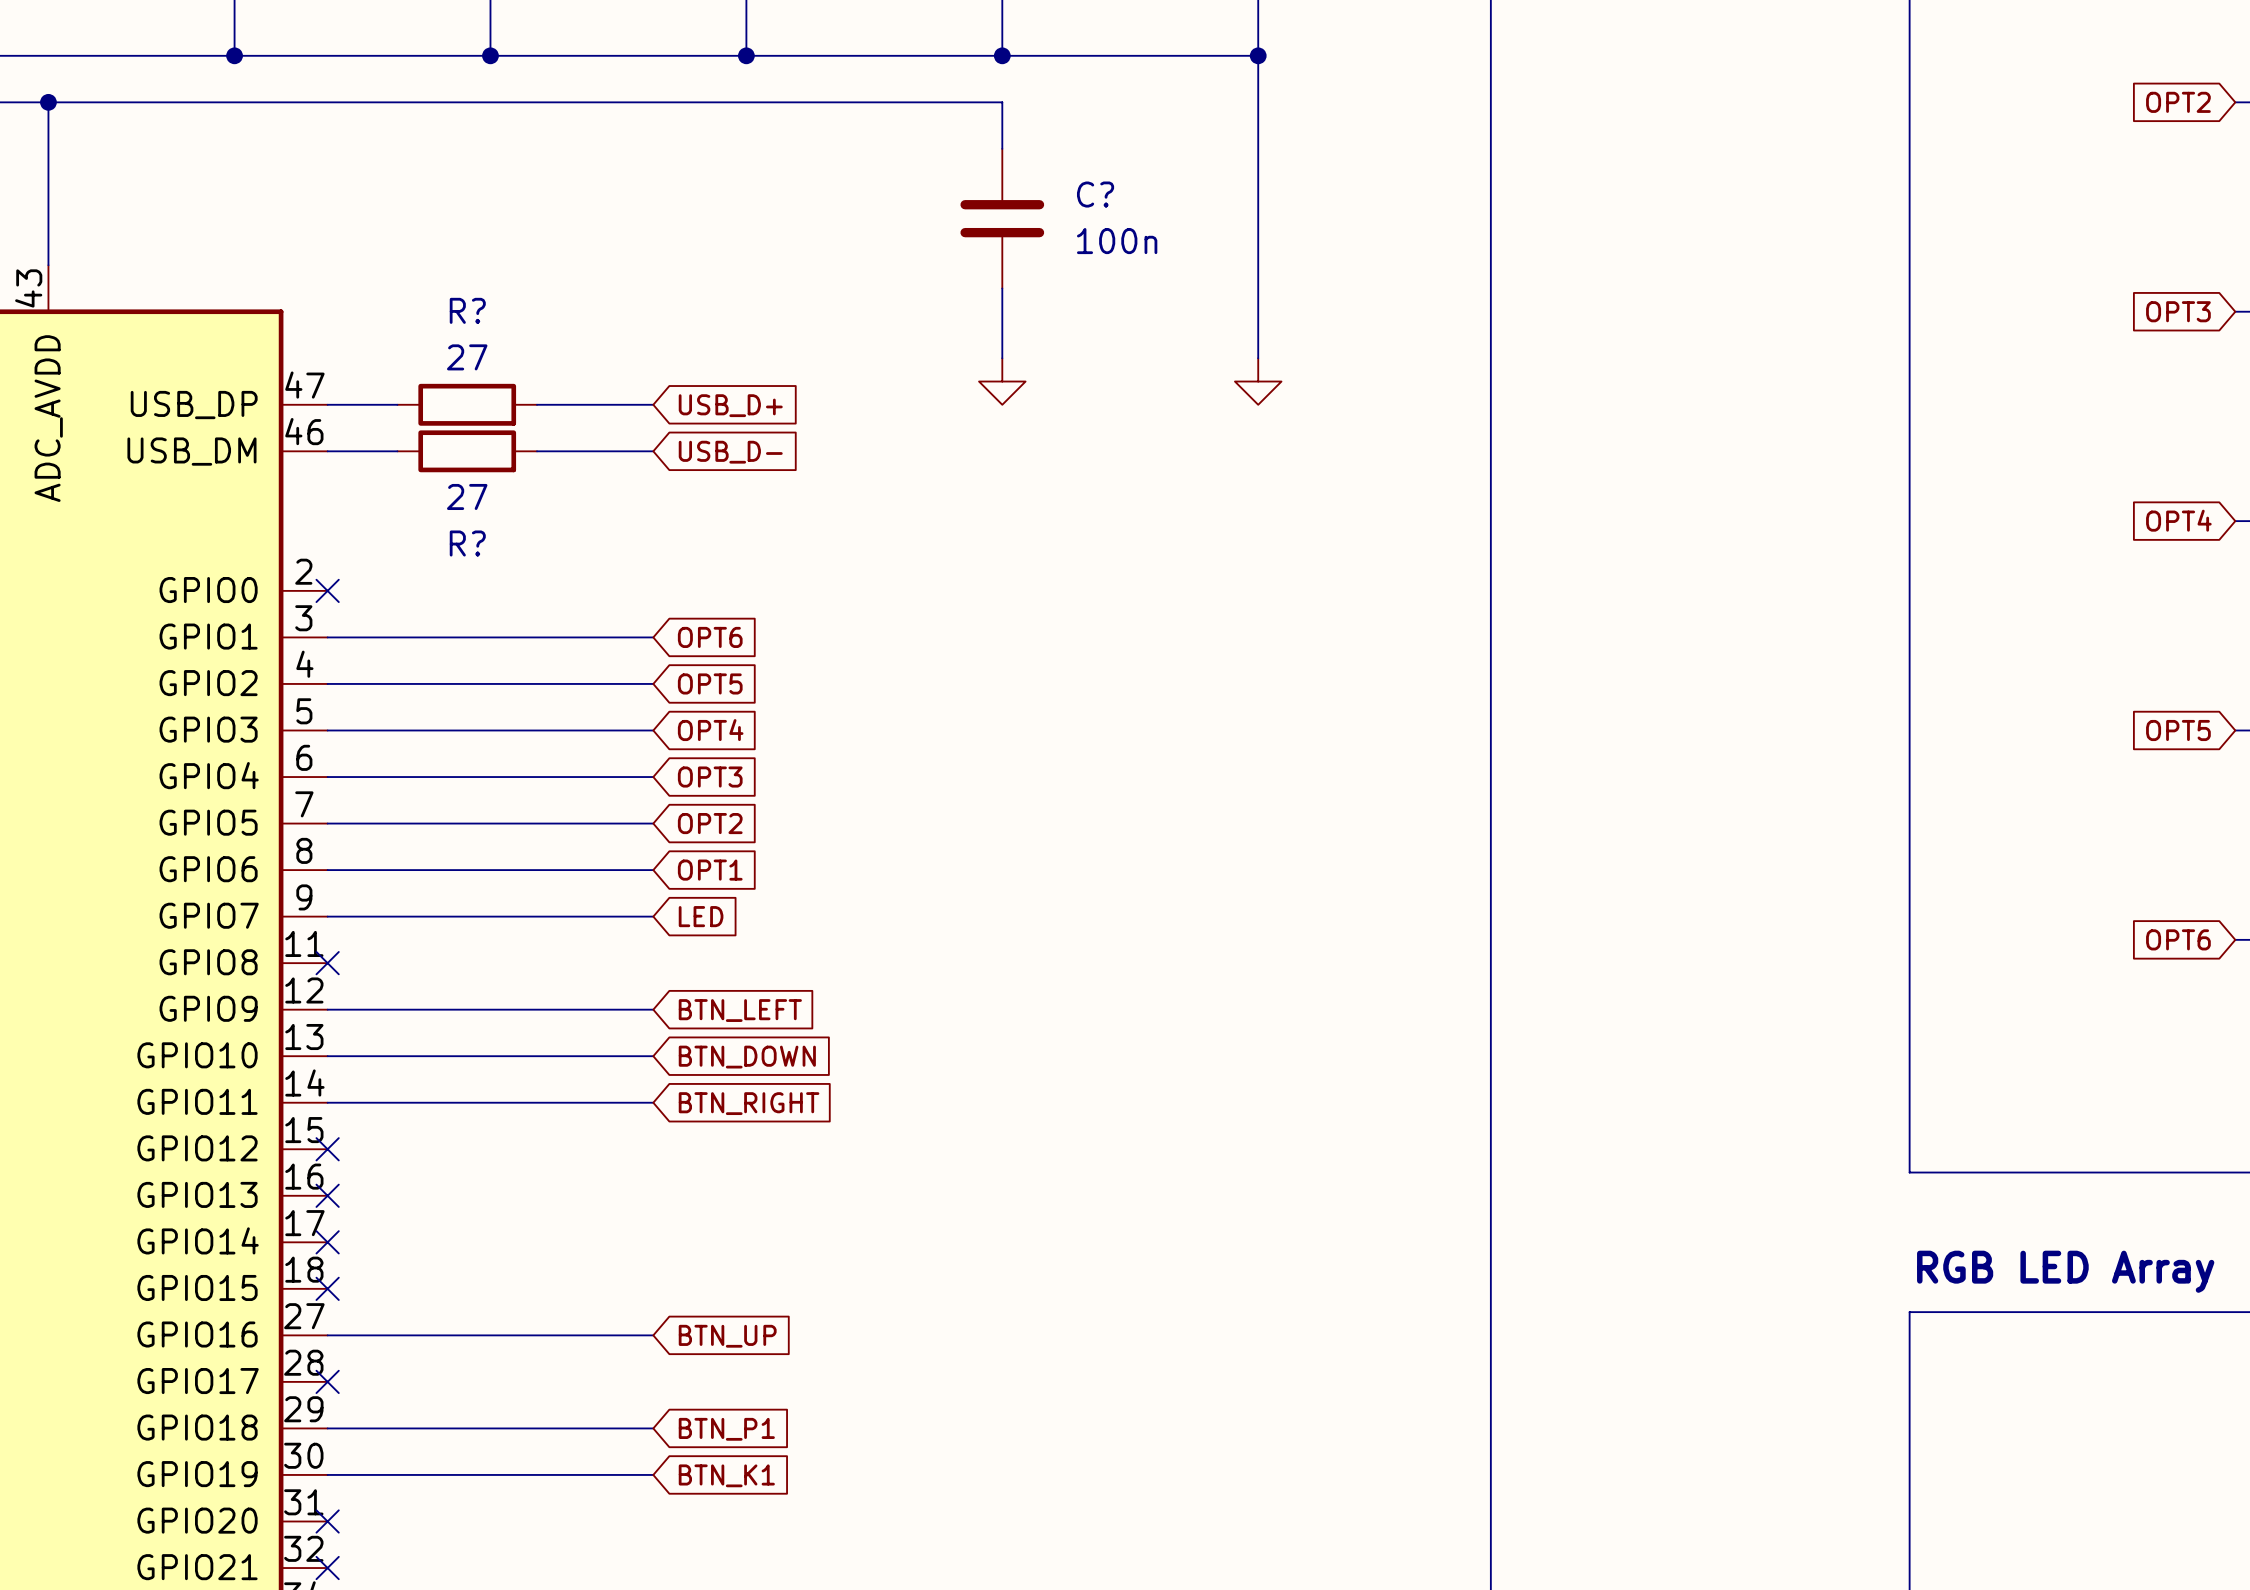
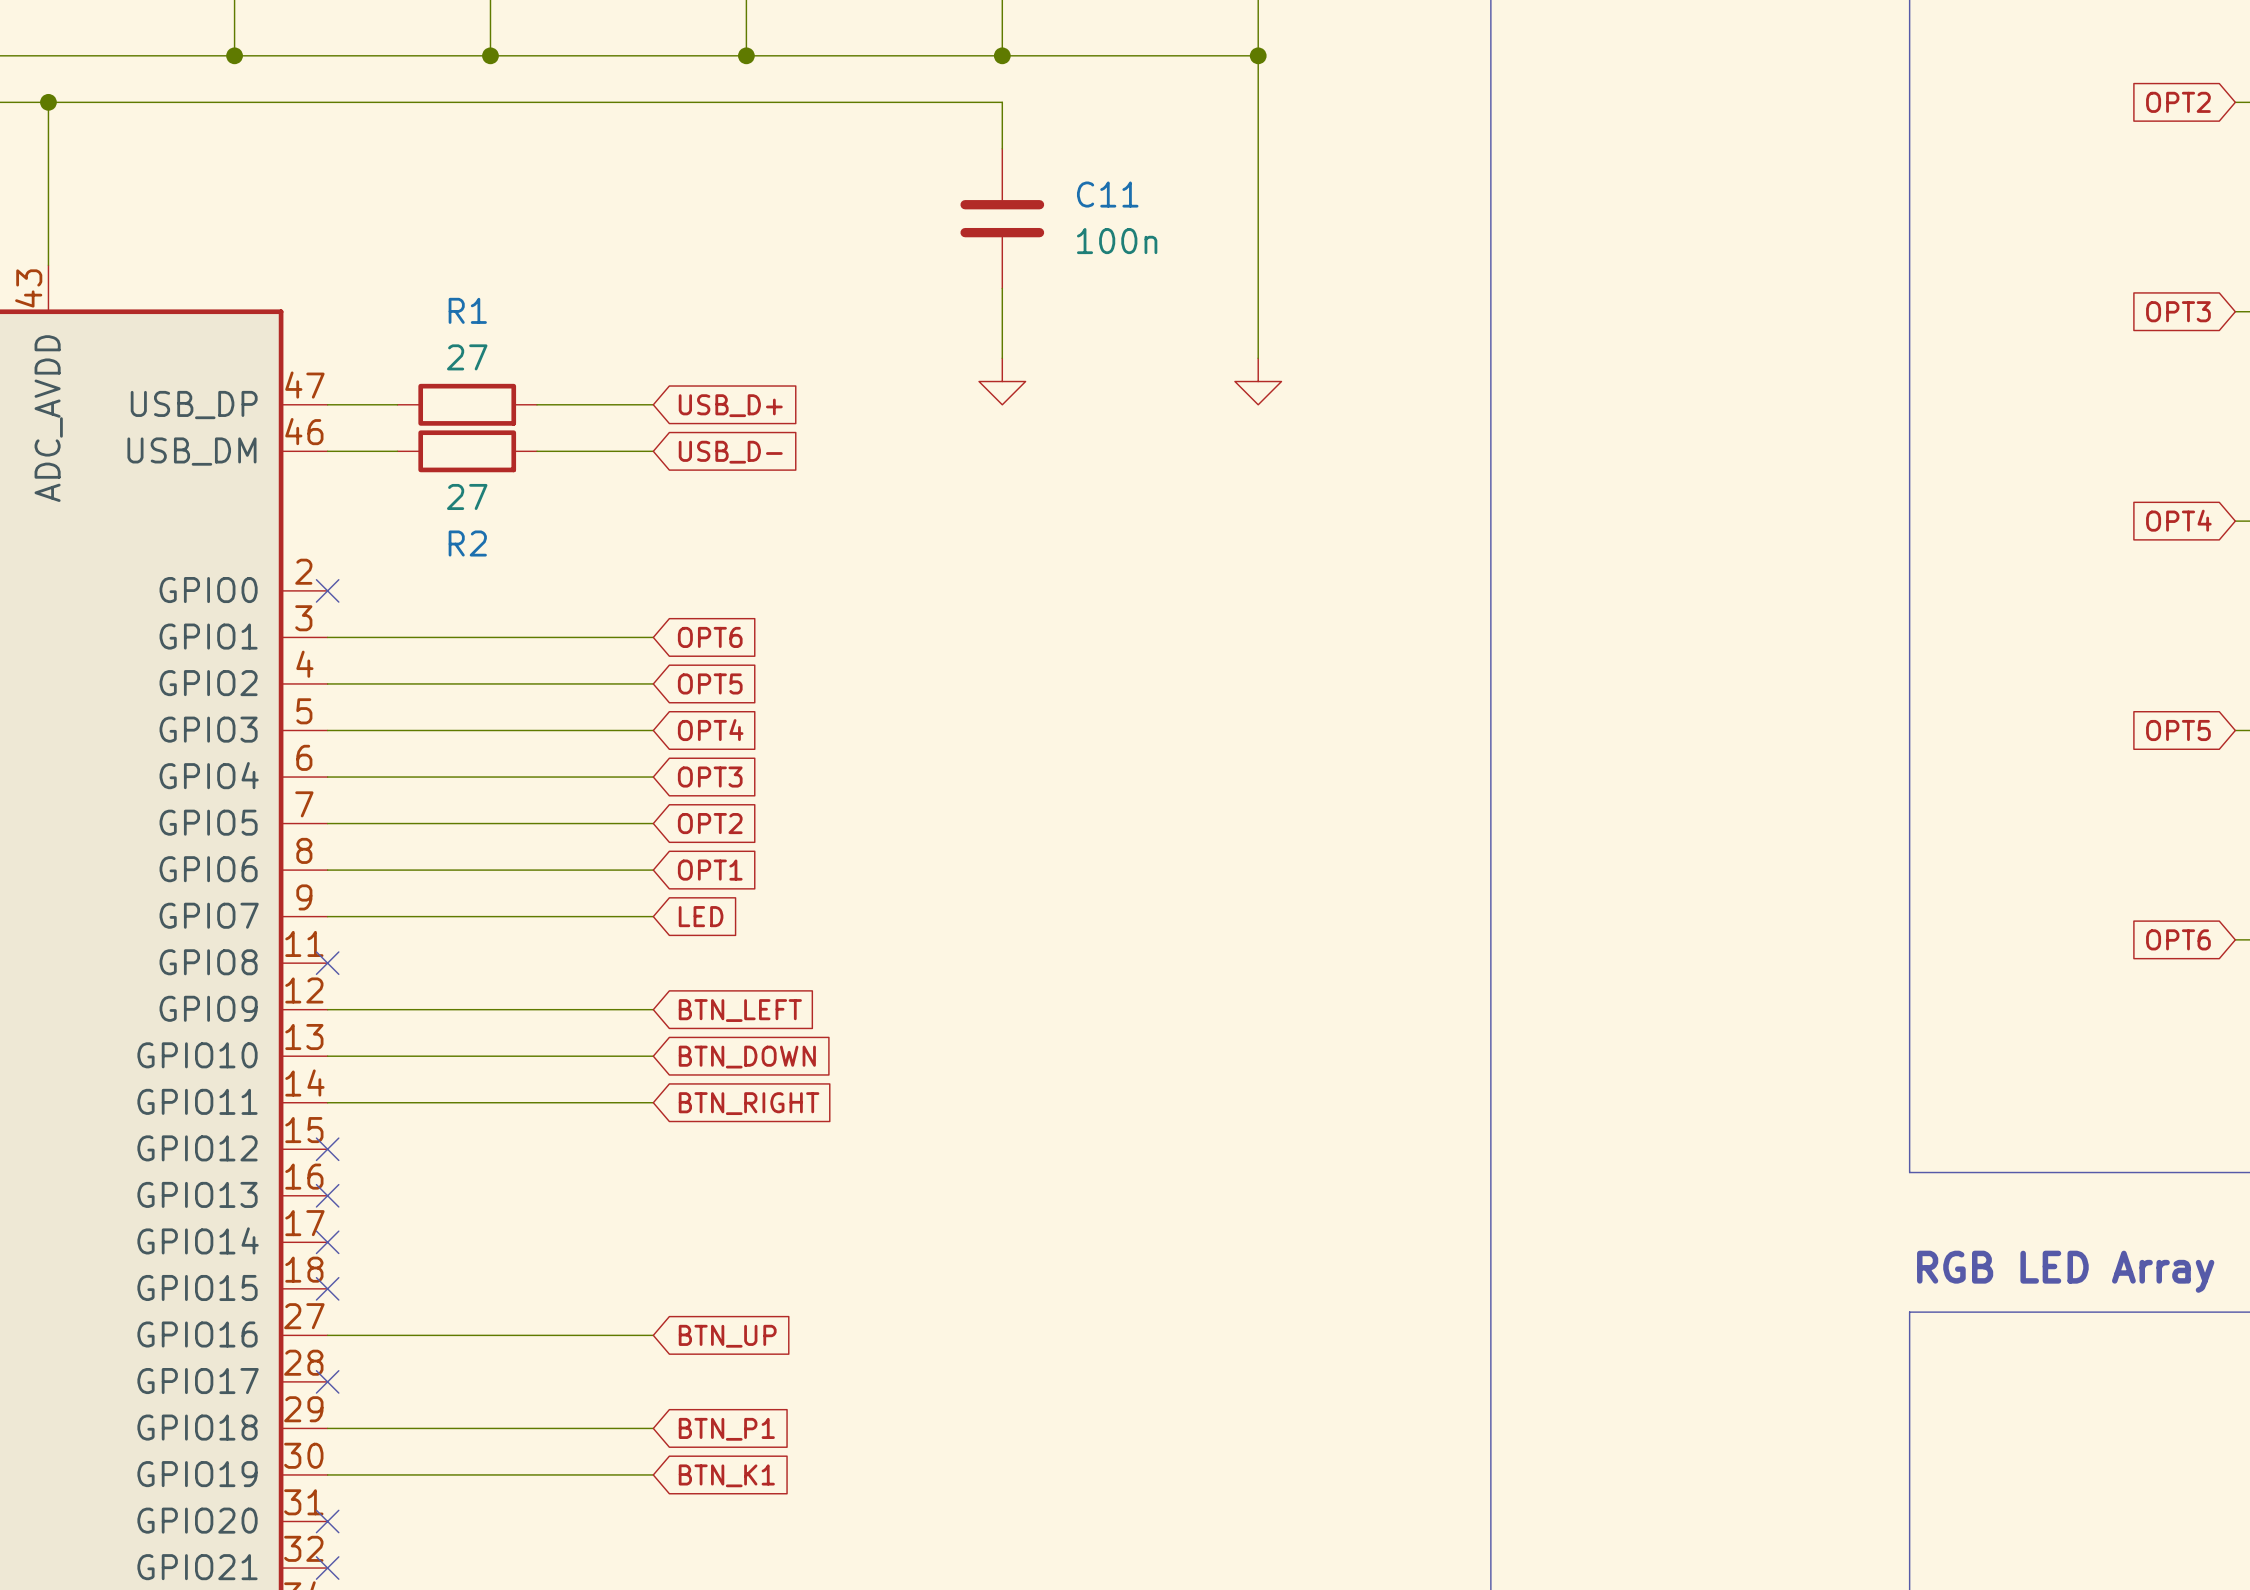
C? name: C? (1095, 194) -> C11 (1107, 194)
R? name: R? (467, 310) -> R1 (467, 310)
R? name: R? (467, 543) -> R2 (467, 543)

